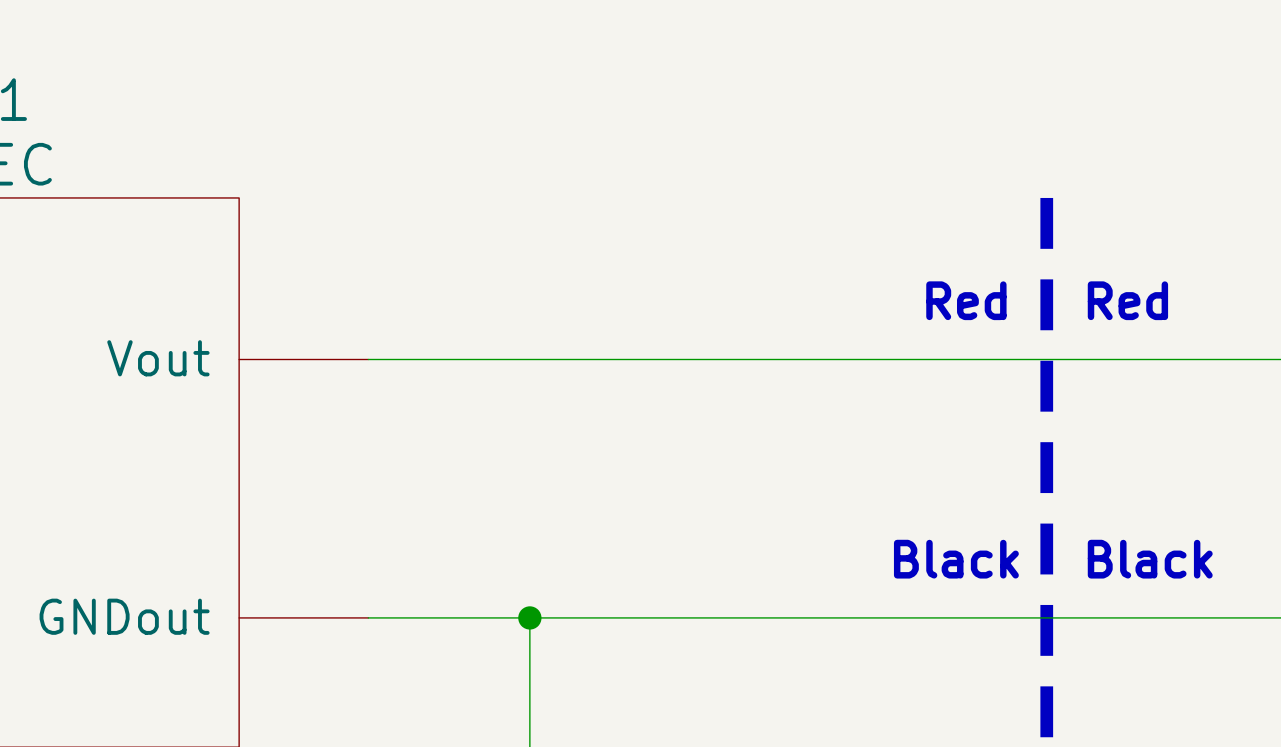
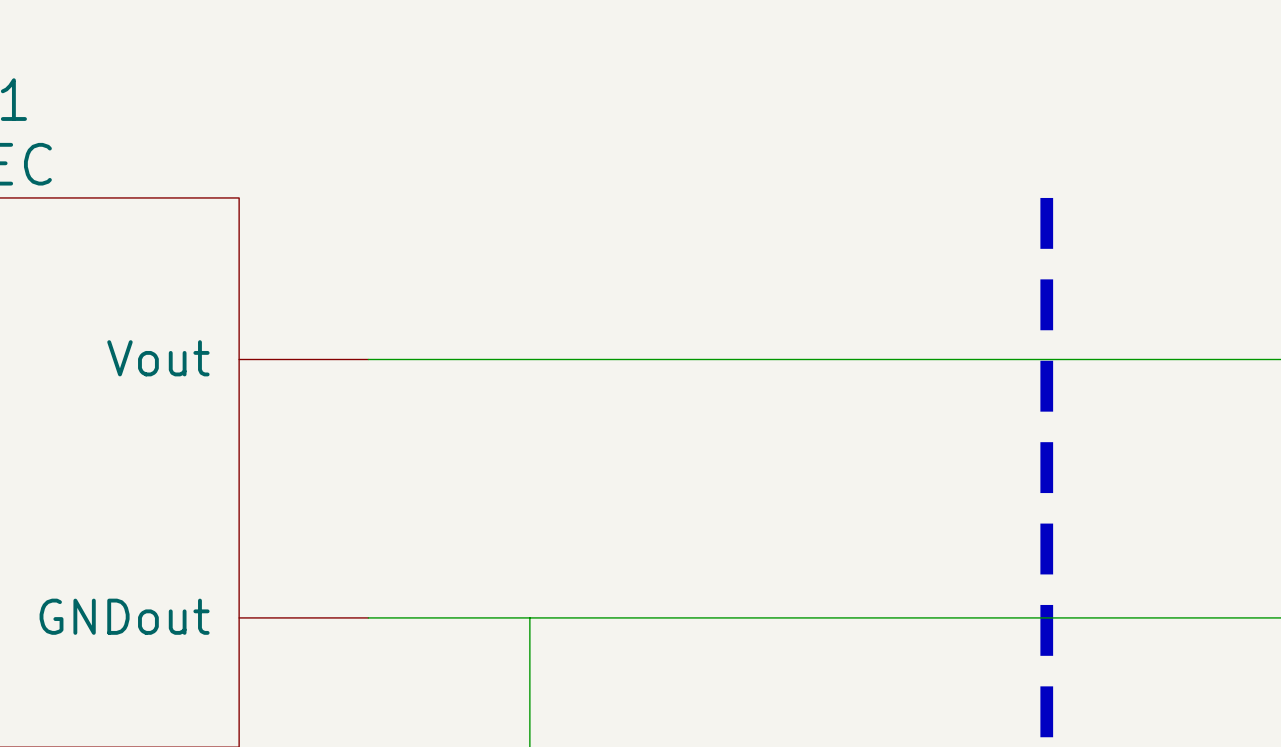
text: Red (966, 300) -> none
text: Red (1127, 300) -> none
text: Black (956, 559) -> none
text: Black (1150, 559) -> none
junction: (529, 617) -> none

